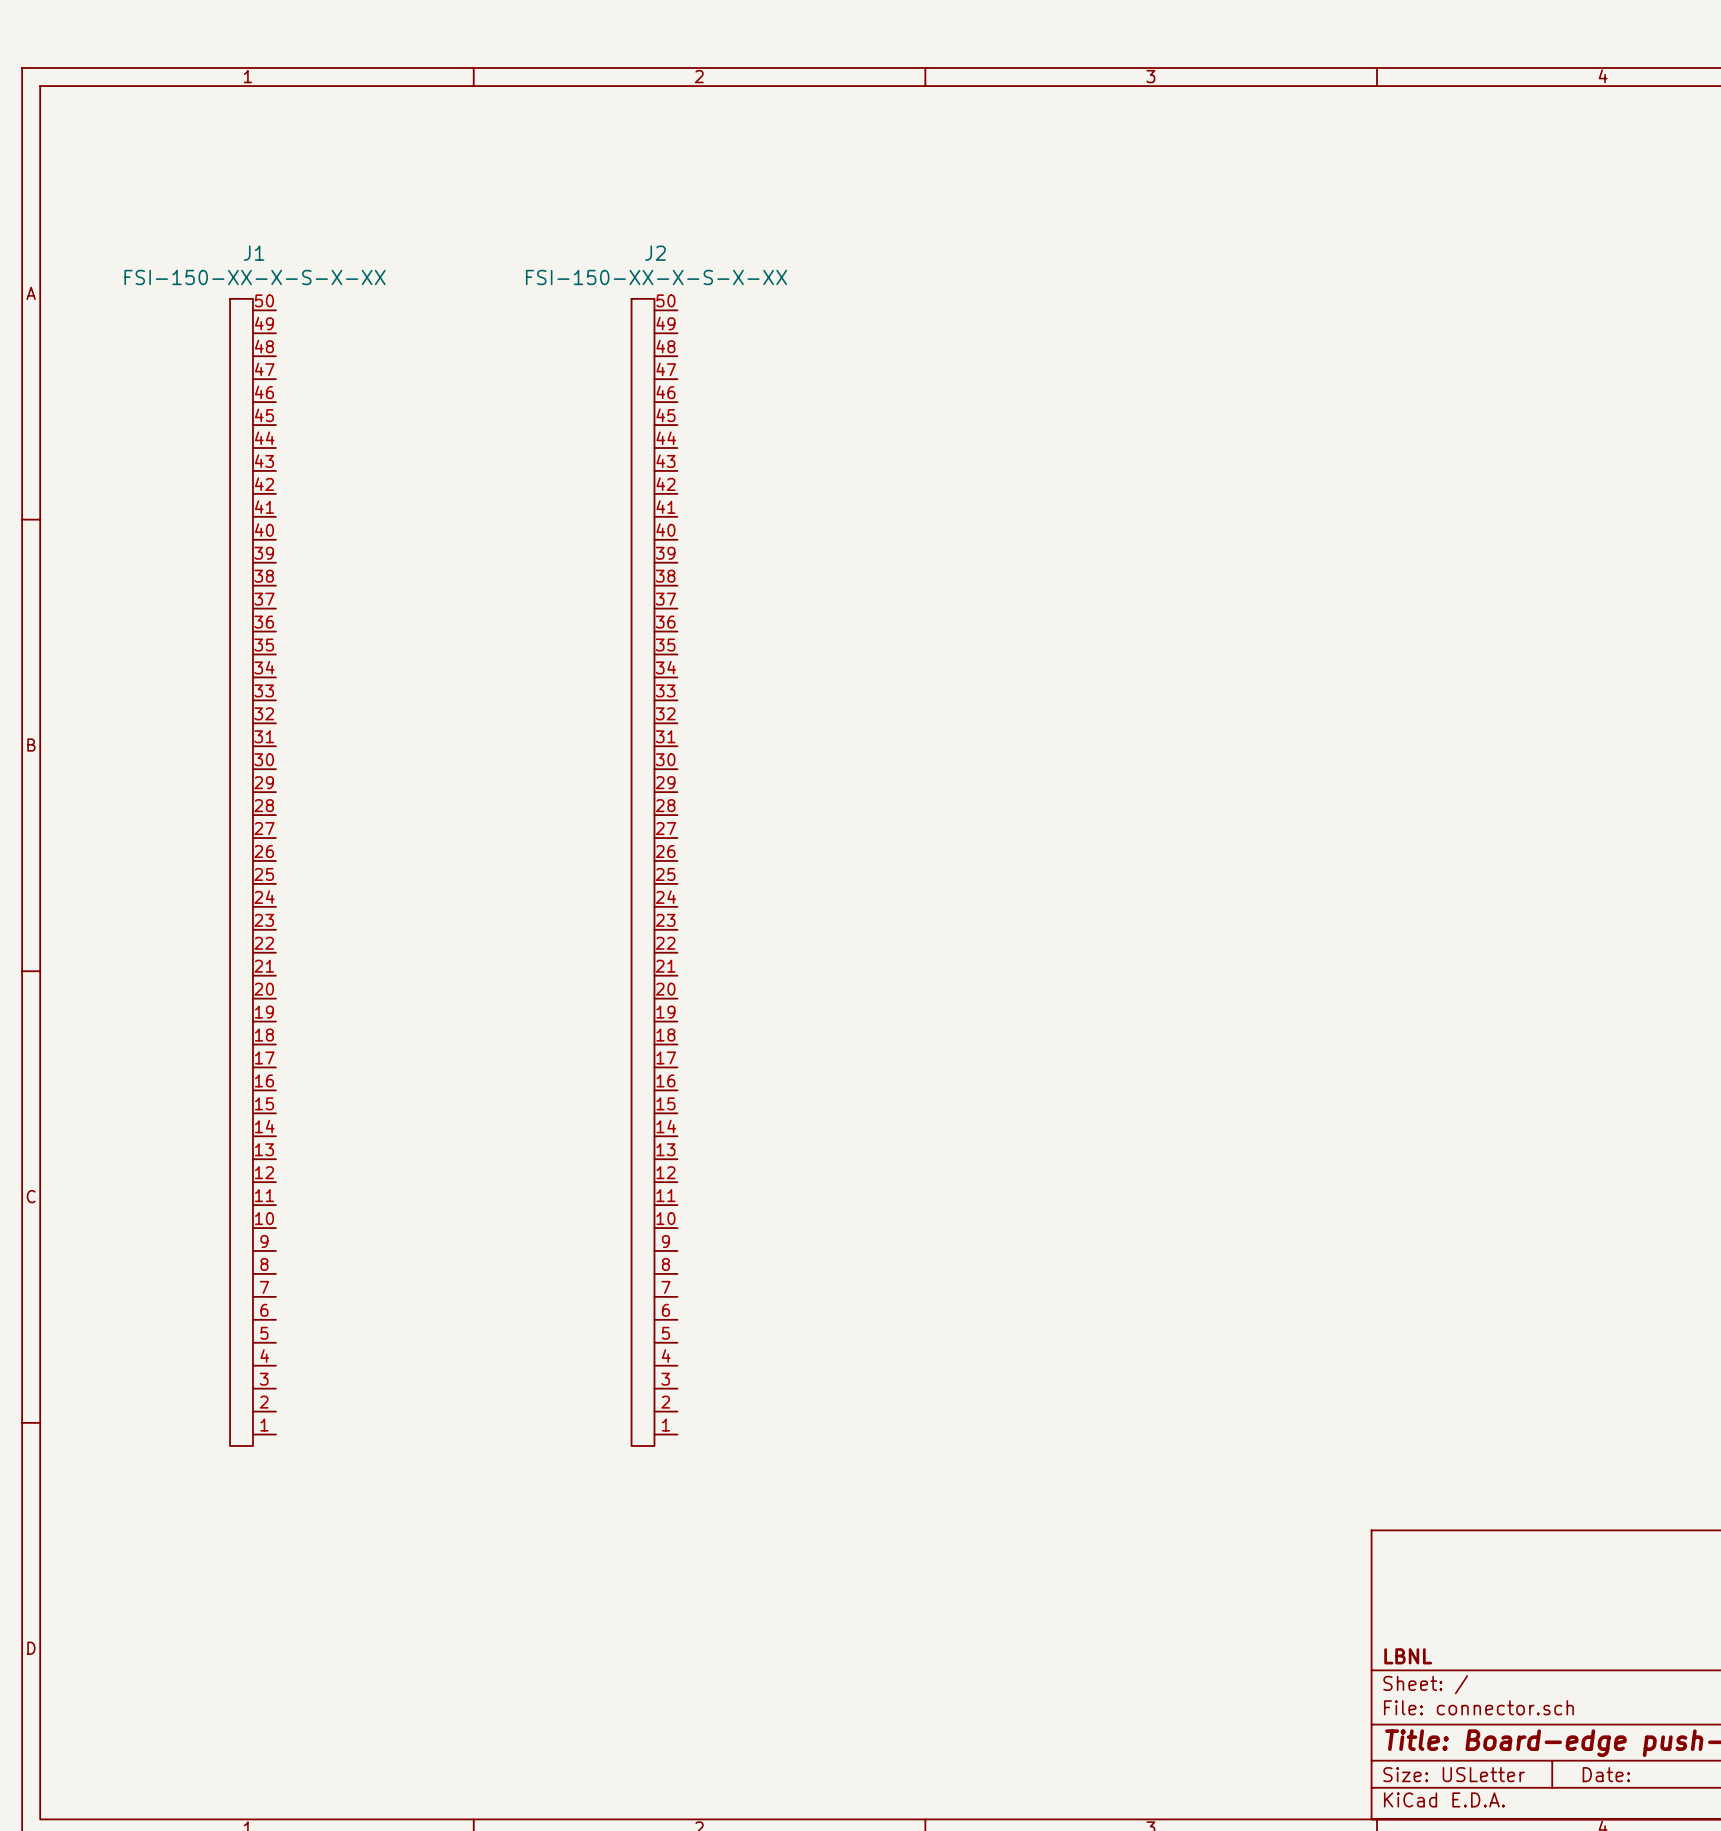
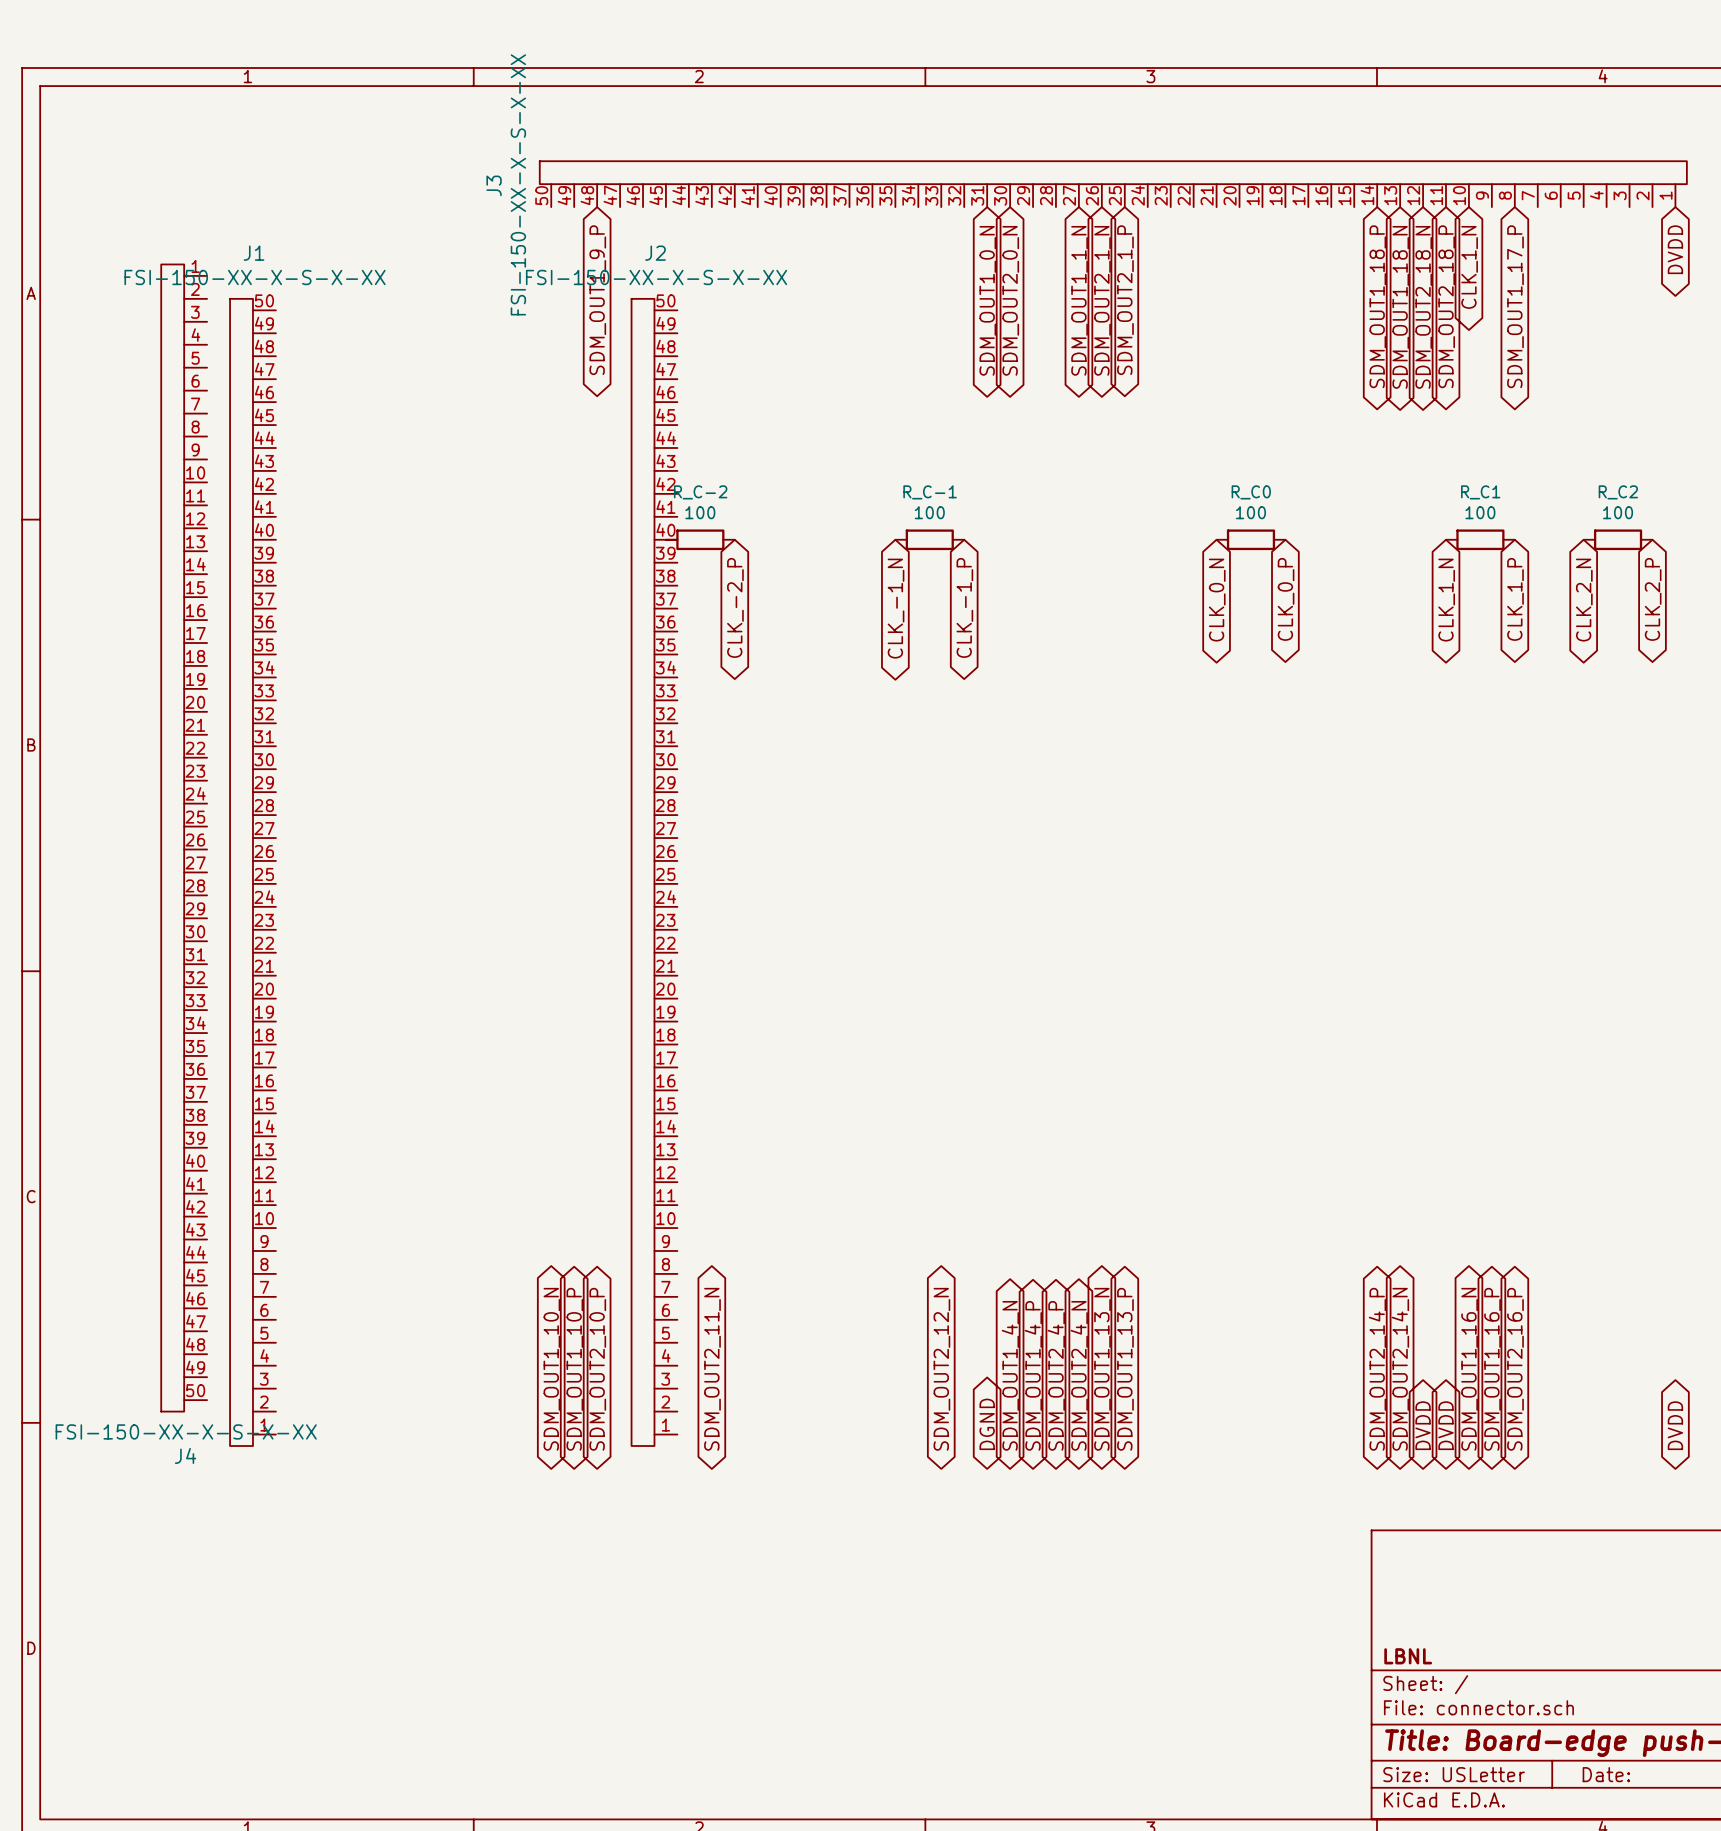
J3: none -> FSI-150-XX-X-S-X-XX (1113, 184)
global label: none -> DVDD (1675, 249)
global label: none -> CLK_1_N (1469, 267)
global label: none -> SDM_OUT1_9_P (597, 300)
global label: none -> SDM_OUT1_0_N (987, 300)
global label: none -> SDM_OUT2_0_N (1010, 300)
global label: none -> SDM_OUT1_1_N (1079, 300)
global label: none -> SDM_OUT2_1_N (1102, 300)
global label: none -> SDM_OUT2_1_P (1125, 300)
global label: none -> SDM_OUT1_18_P (1377, 306)
global label: none -> SDM_OUT2_18_P (1446, 306)
global label: none -> SDM_OUT1_17_P (1515, 306)
global label: none -> SDM_OUT1_18_N (1400, 307)
global label: none -> SDM_OUT2_18_N (1423, 307)
R_C-2: none -> 100 (700, 539)
R_C-1: none -> 100 (929, 539)
R_C0: none -> 100 (1250, 539)
R_C1: none -> 100 (1480, 539)
R_C2: none -> 100 (1618, 539)
global label: none -> CLK_0_P (1286, 599)
global label: none -> CLK_1_P (1515, 599)
global label: none -> CLK_2_P (1653, 599)
global label: none -> CLK_0_N (1217, 600)
global label: none -> CLK_1_N (1446, 600)
global label: none -> CLK_2_N (1584, 600)
global label: none -> CLK_-2_P (735, 607)
global label: none -> CLK_-1_P (964, 607)
global label: none -> CLK_-1_N (896, 608)
J4: none -> FSI-150-XX-X-S-X-XX (184, 838)
global label: none -> SDM_OUT1_10_N (551, 1369)
global label: none -> SDM_OUT1_10_P (574, 1369)
global label: none -> SDM_OUT2_10_P (597, 1369)
global label: none -> SDM_OUT2_11_N (712, 1369)
global label: none -> SDM_OUT2_12_N (941, 1369)
global label: none -> SDM_OUT1_13_N (1102, 1369)
global label: none -> SDM_OUT1_13_P (1125, 1369)
global label: none -> SDM_OUT2_14_P (1377, 1369)
global label: none -> SDM_OUT2_14_N (1400, 1369)
global label: none -> SDM_OUT1_16_N (1469, 1369)
global label: none -> SDM_OUT1_16_P (1492, 1369)
global label: none -> SDM_OUT2_16_P (1515, 1369)
global label: none -> SDM_OUT1_4_N (1010, 1375)
global label: none -> SDM_OUT1_4_P (1033, 1375)
global label: none -> SDM_OUT2_4_P (1056, 1375)
global label: none -> SDM_OUT2_4_N (1079, 1375)
global label: none -> DGND (987, 1424)
global label: none -> DVDD (1423, 1425)
global label: none -> DVDD (1446, 1425)
global label: none -> DVDD (1675, 1425)

